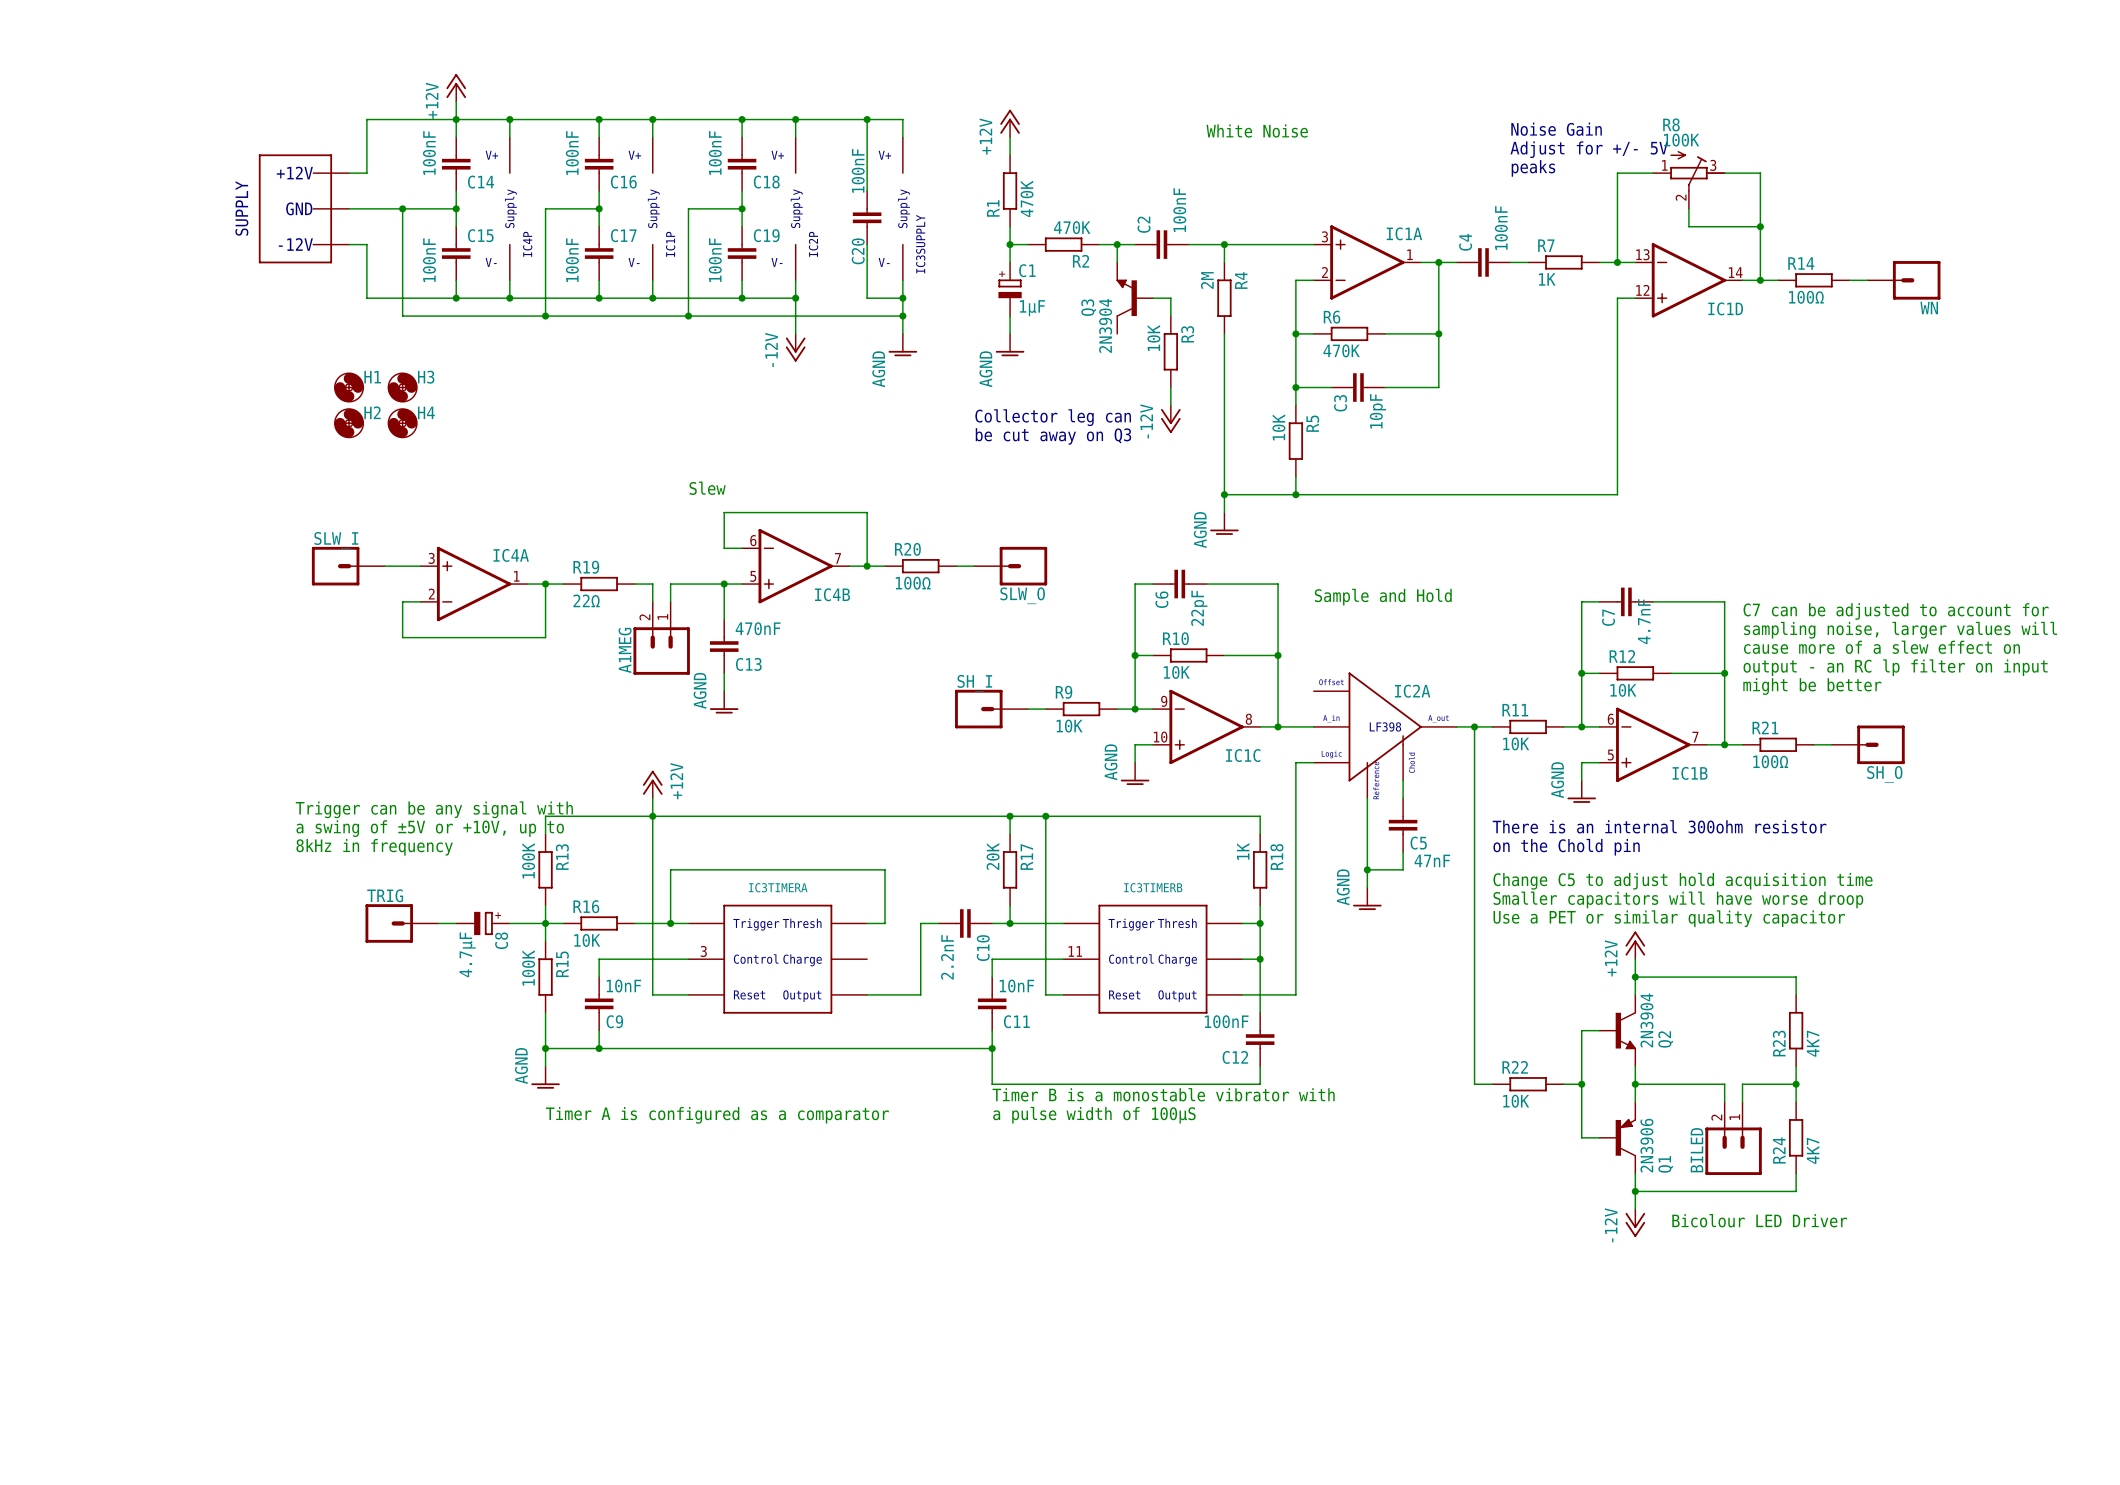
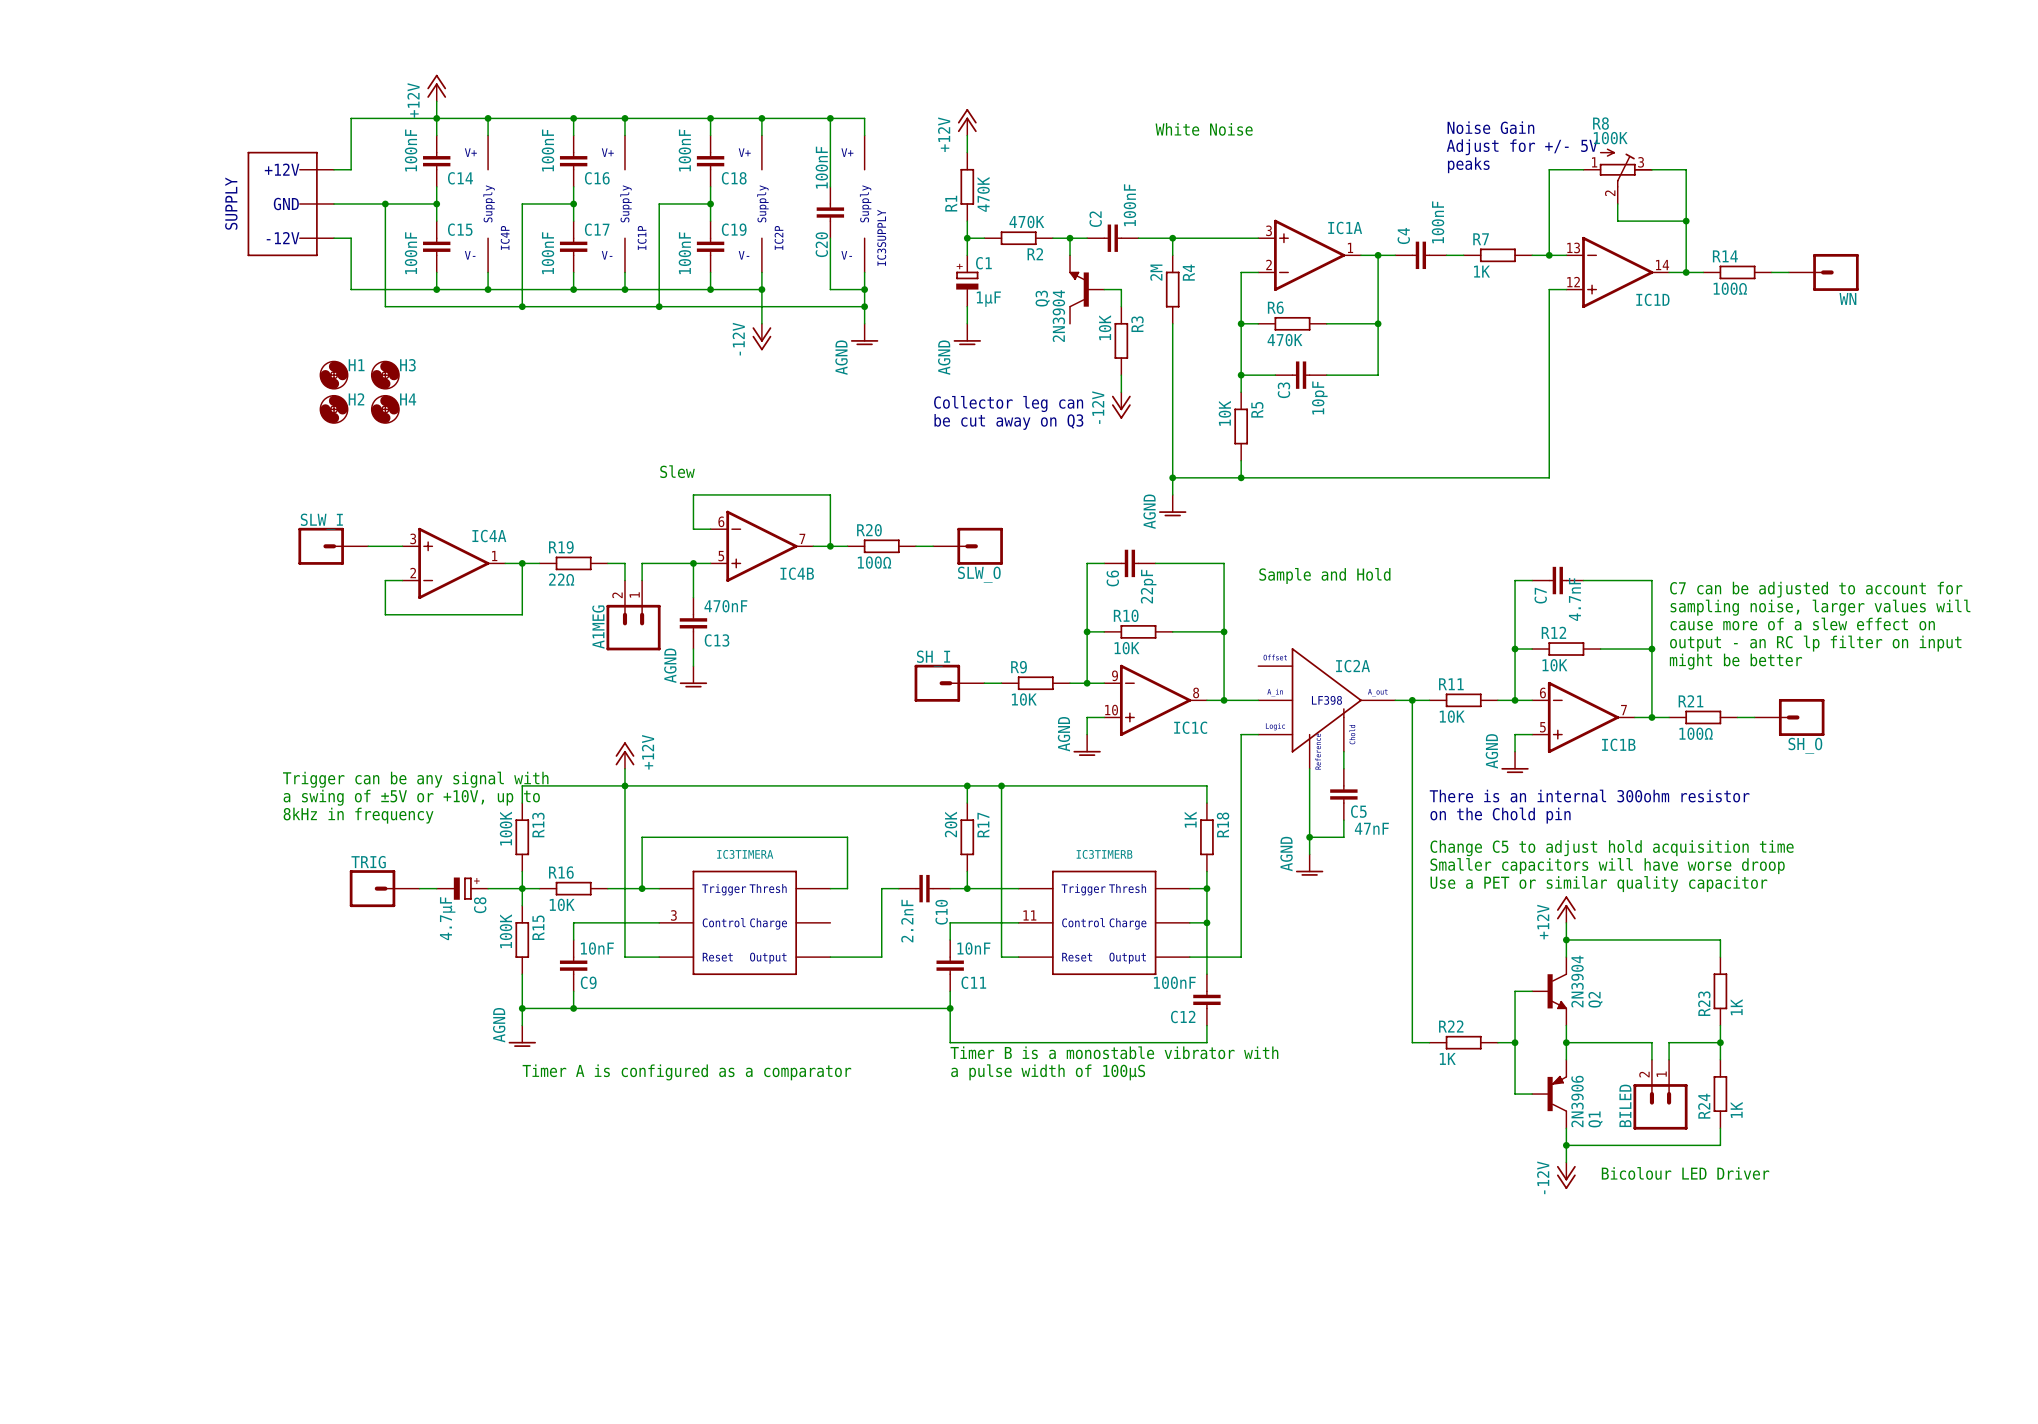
R23 value: 4K7 (1813, 1043) -> 1K (1736, 1007)
R22 value: 10K (1516, 1101) -> 1K (1447, 1058)
R24 value: 4K7 (1813, 1150) -> 1K (1736, 1109)

